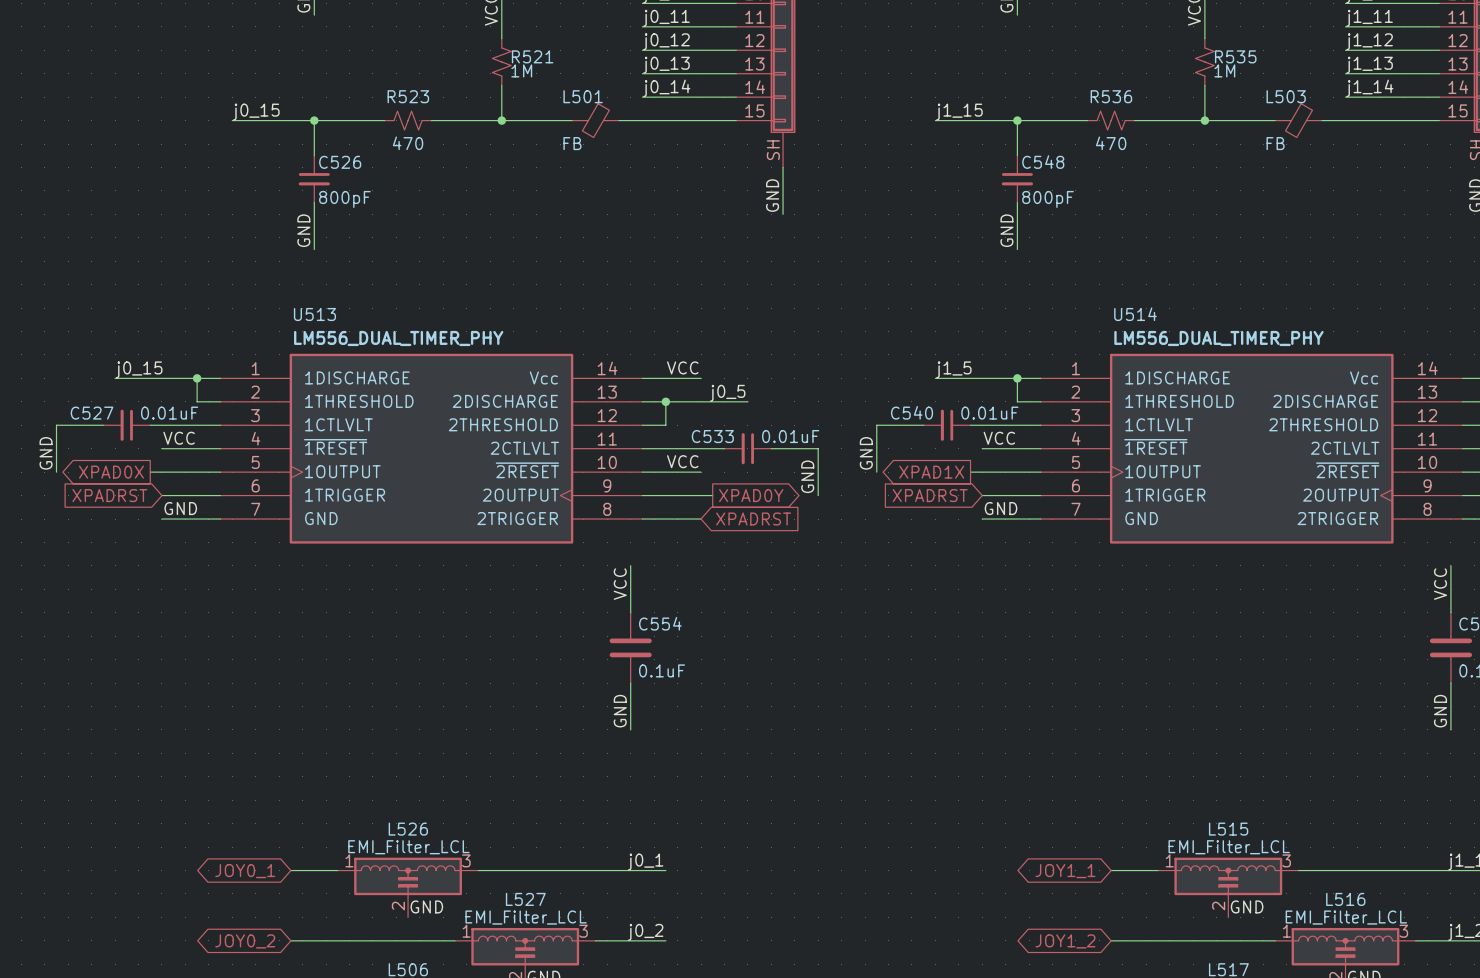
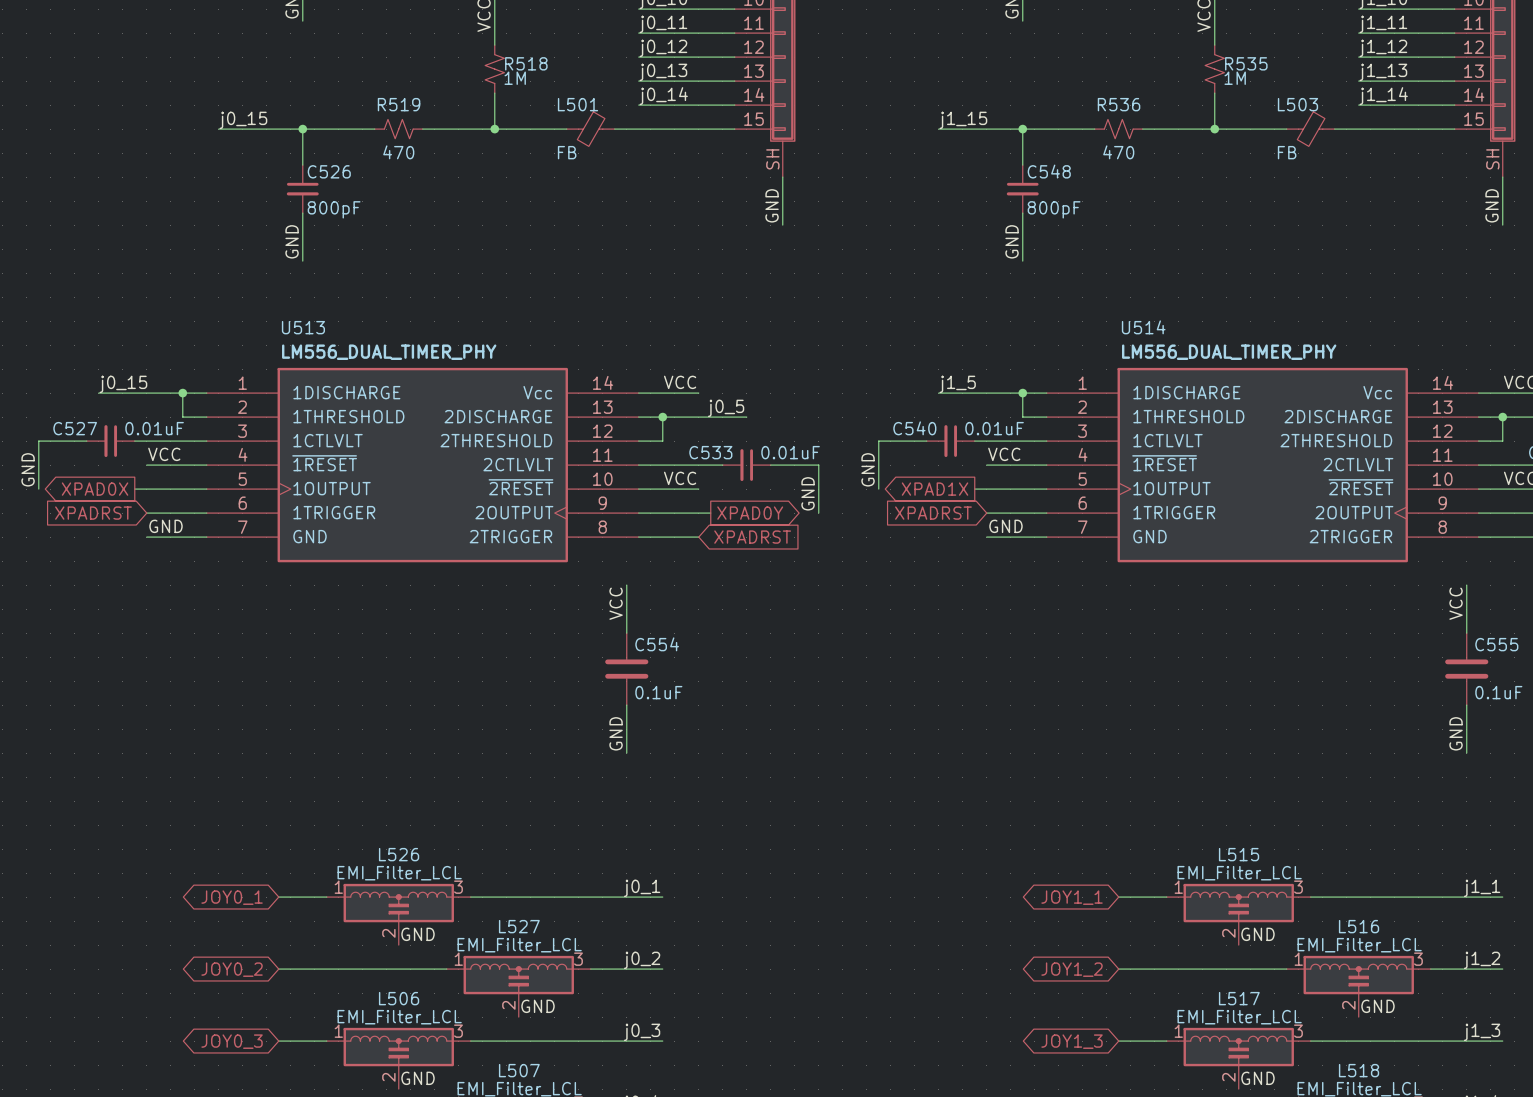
R521 name: R521 (532, 56) -> R518 (526, 63)
R523 name: R523 (408, 96) -> R519 (399, 104)

